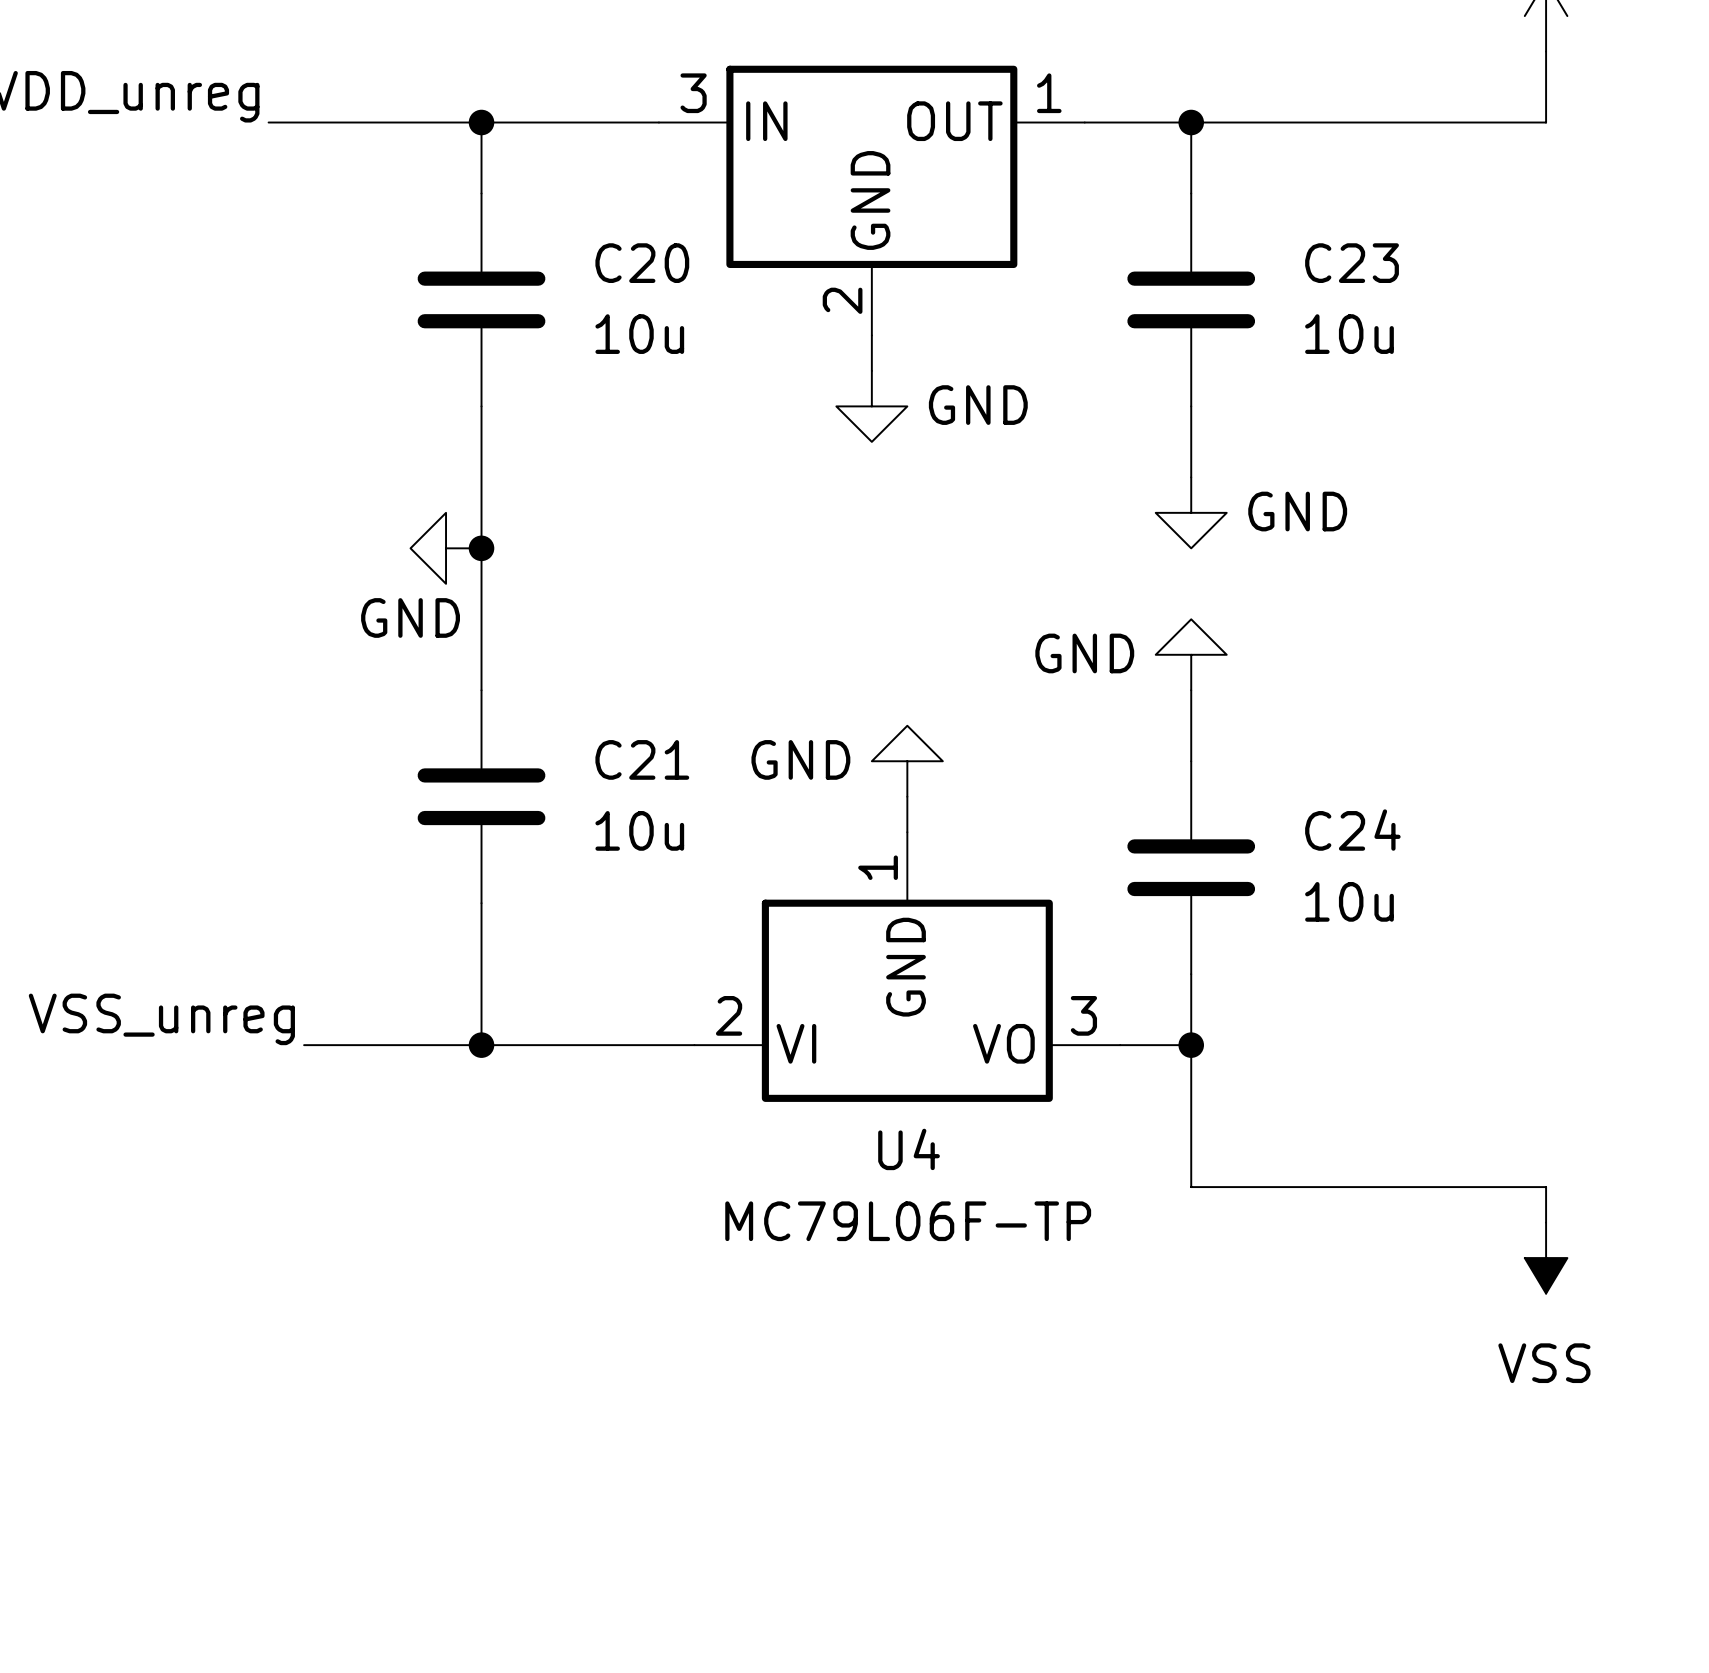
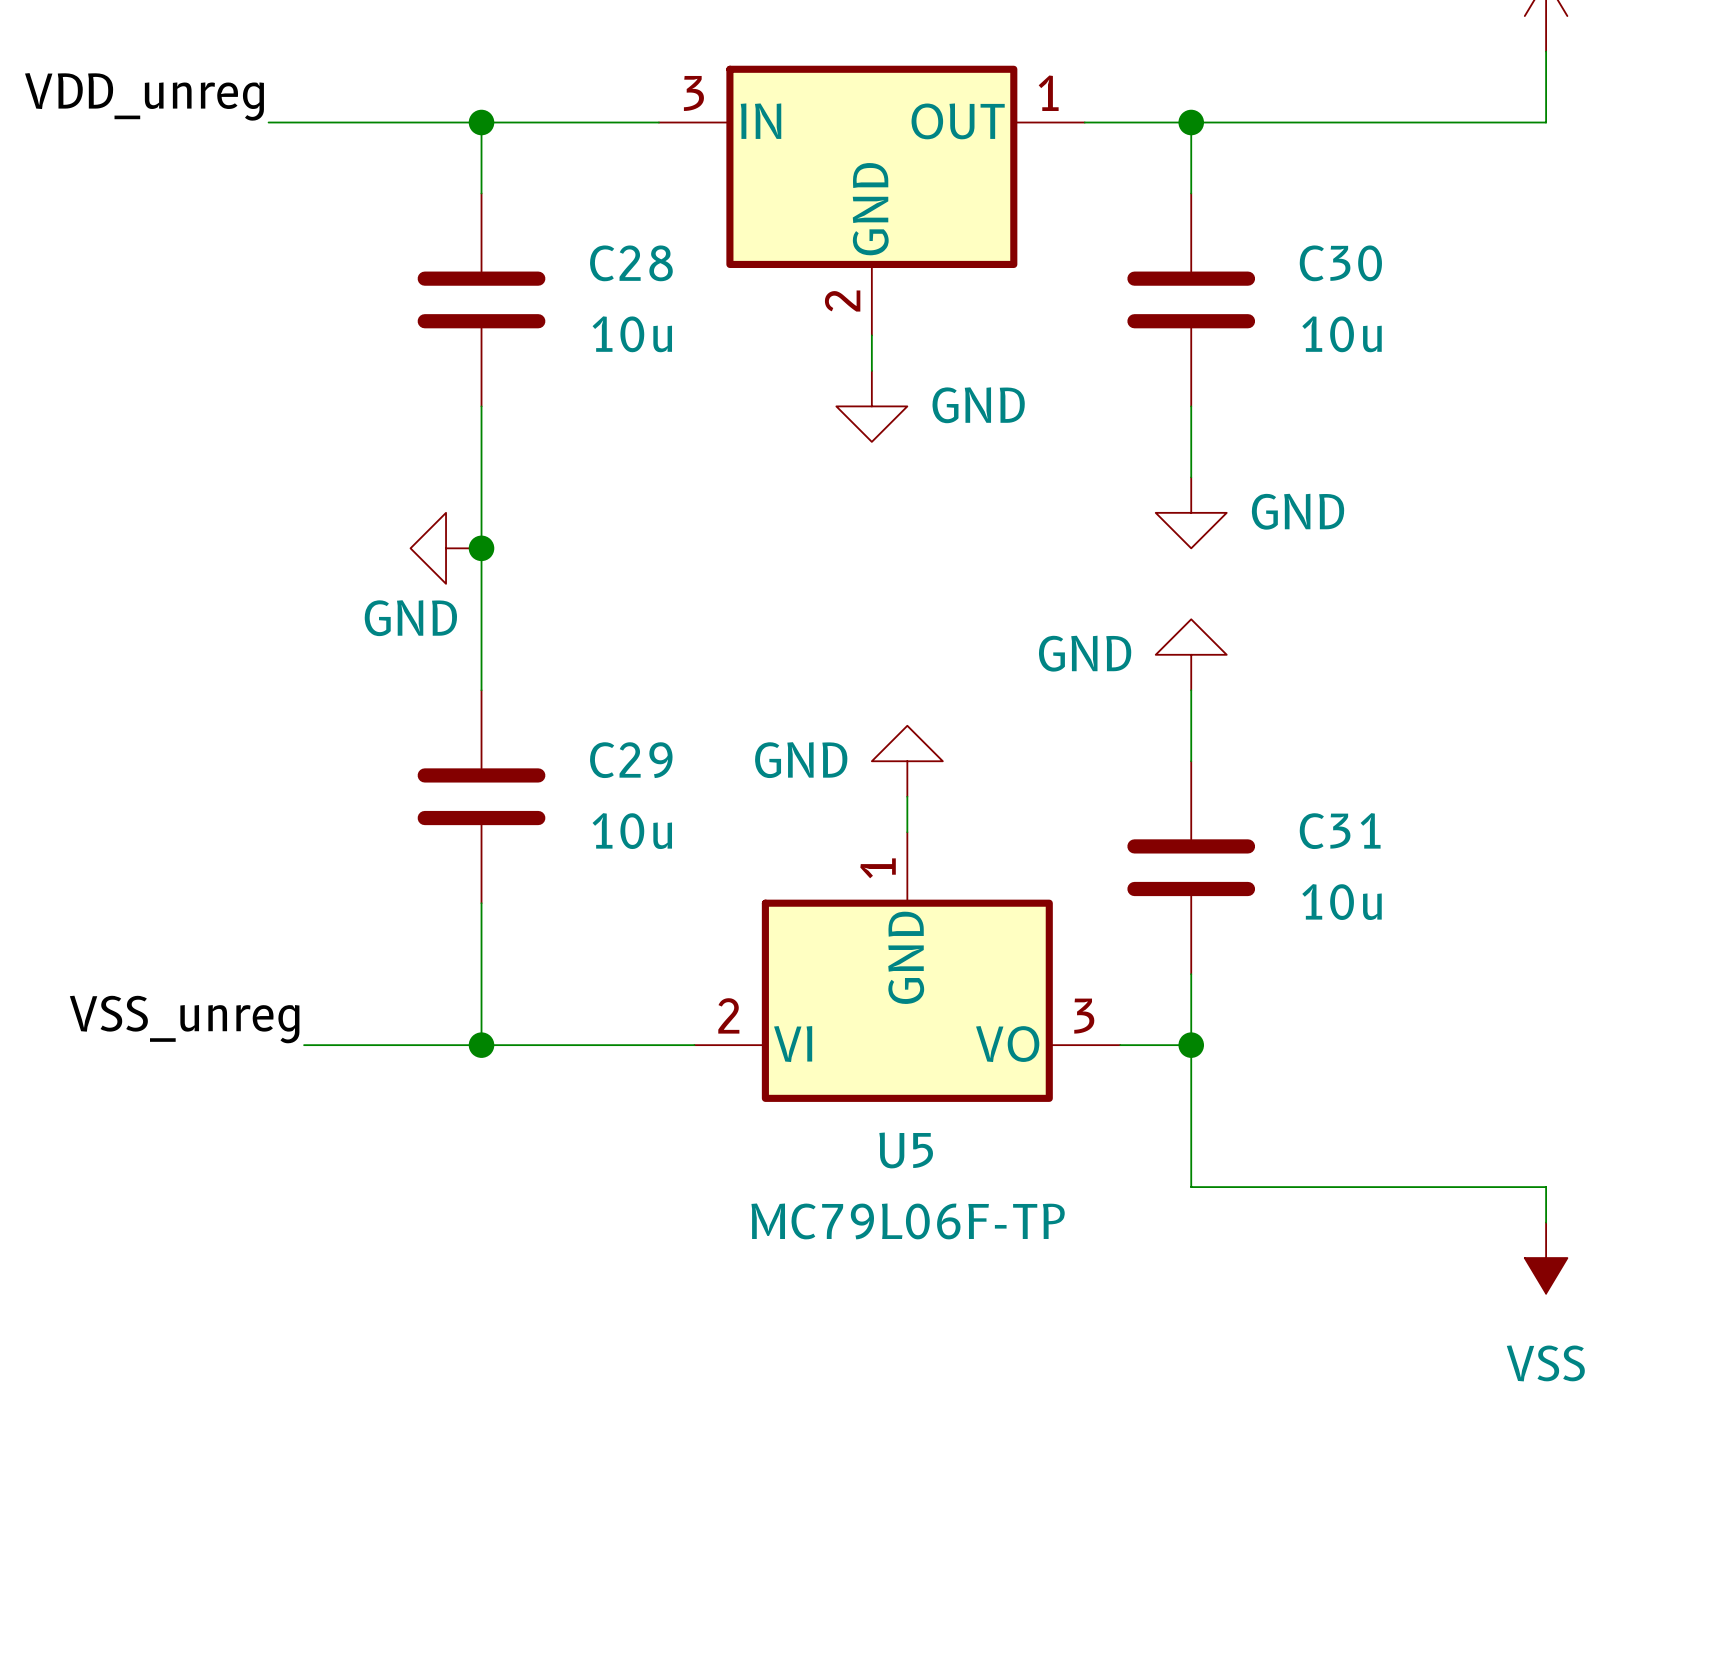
C20 name: C20 (642, 263) -> C28 (631, 263)
C23 name: C23 (1352, 263) -> C30 (1340, 263)
C21 name: C21 (642, 759) -> C29 (631, 760)
C24 name: C24 (1352, 830) -> C31 (1340, 831)
U4 name: U4 (909, 1149) -> U5 (906, 1150)

